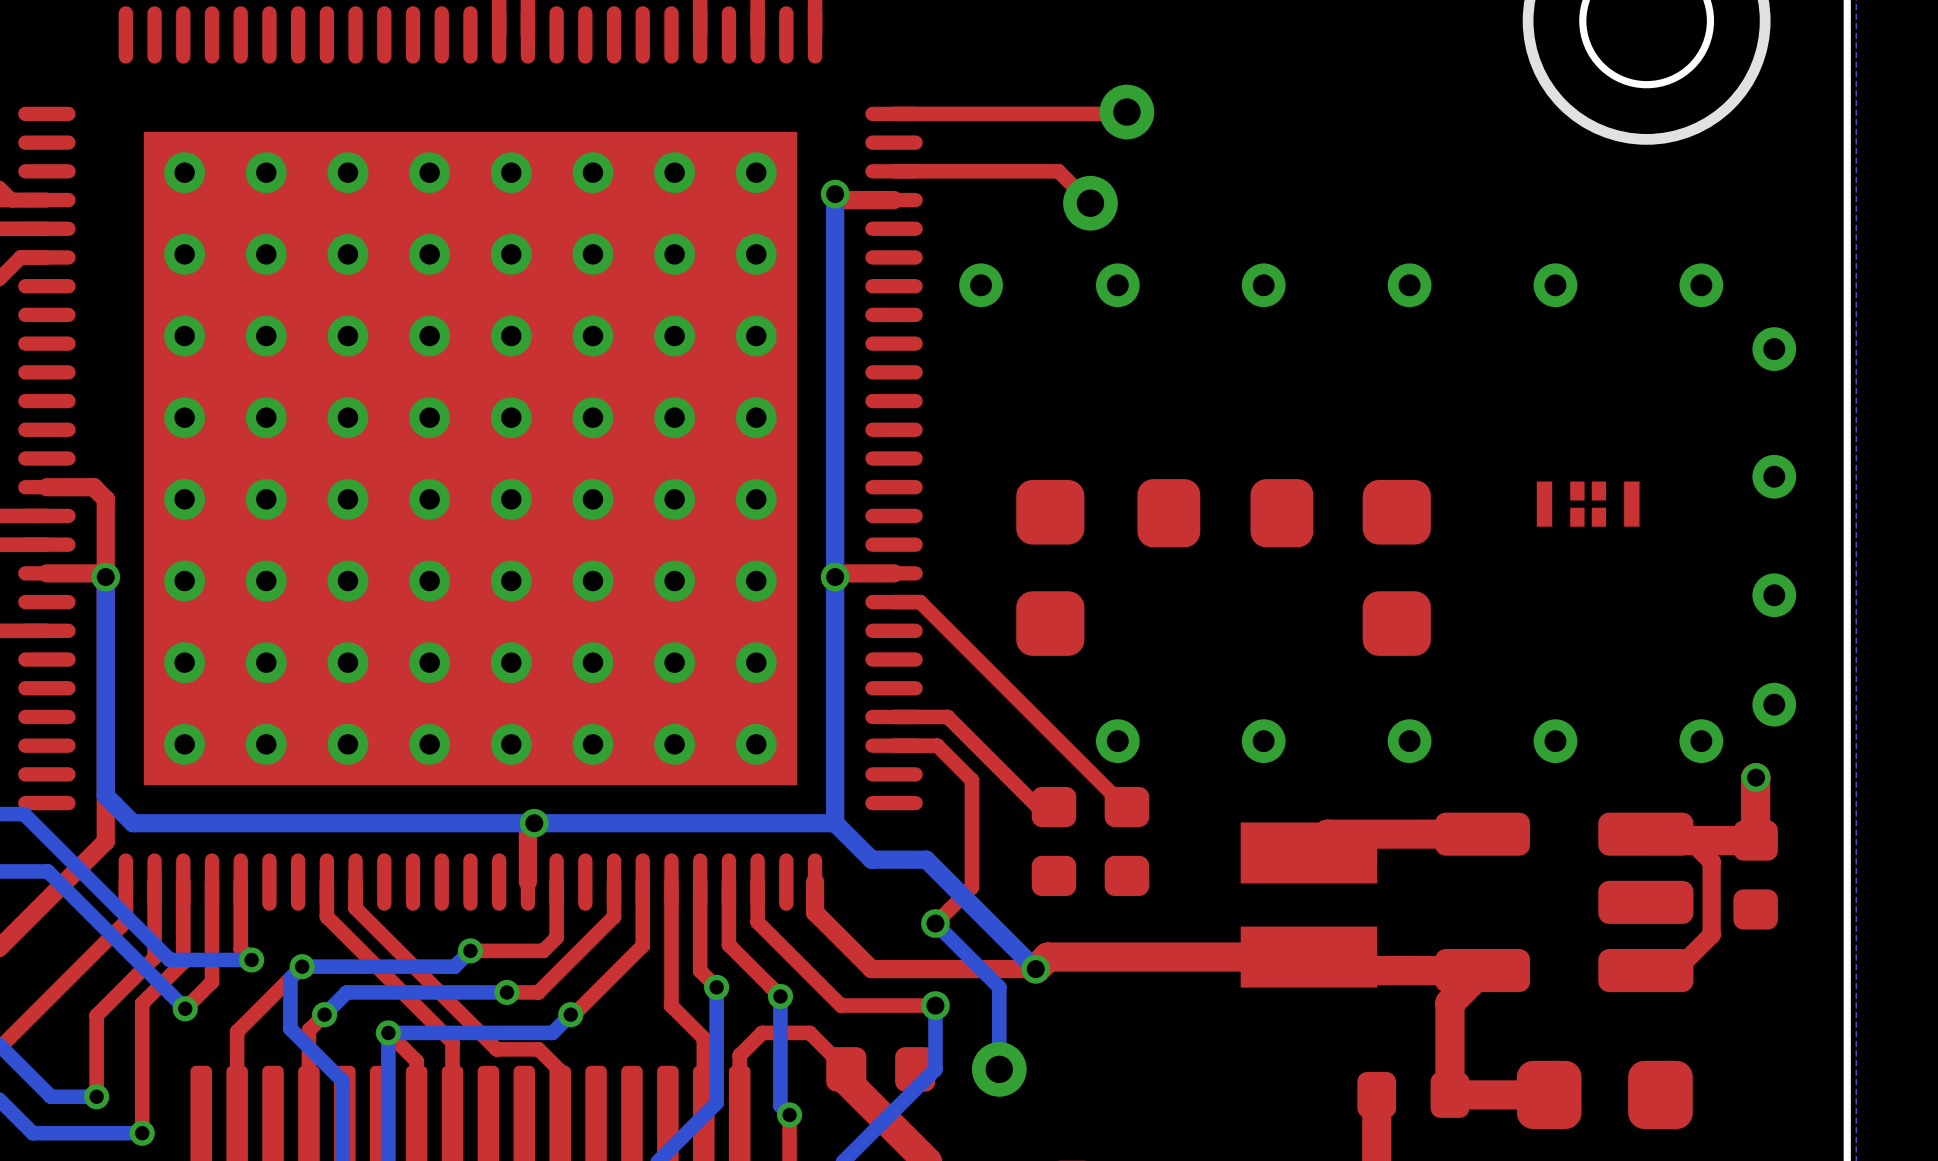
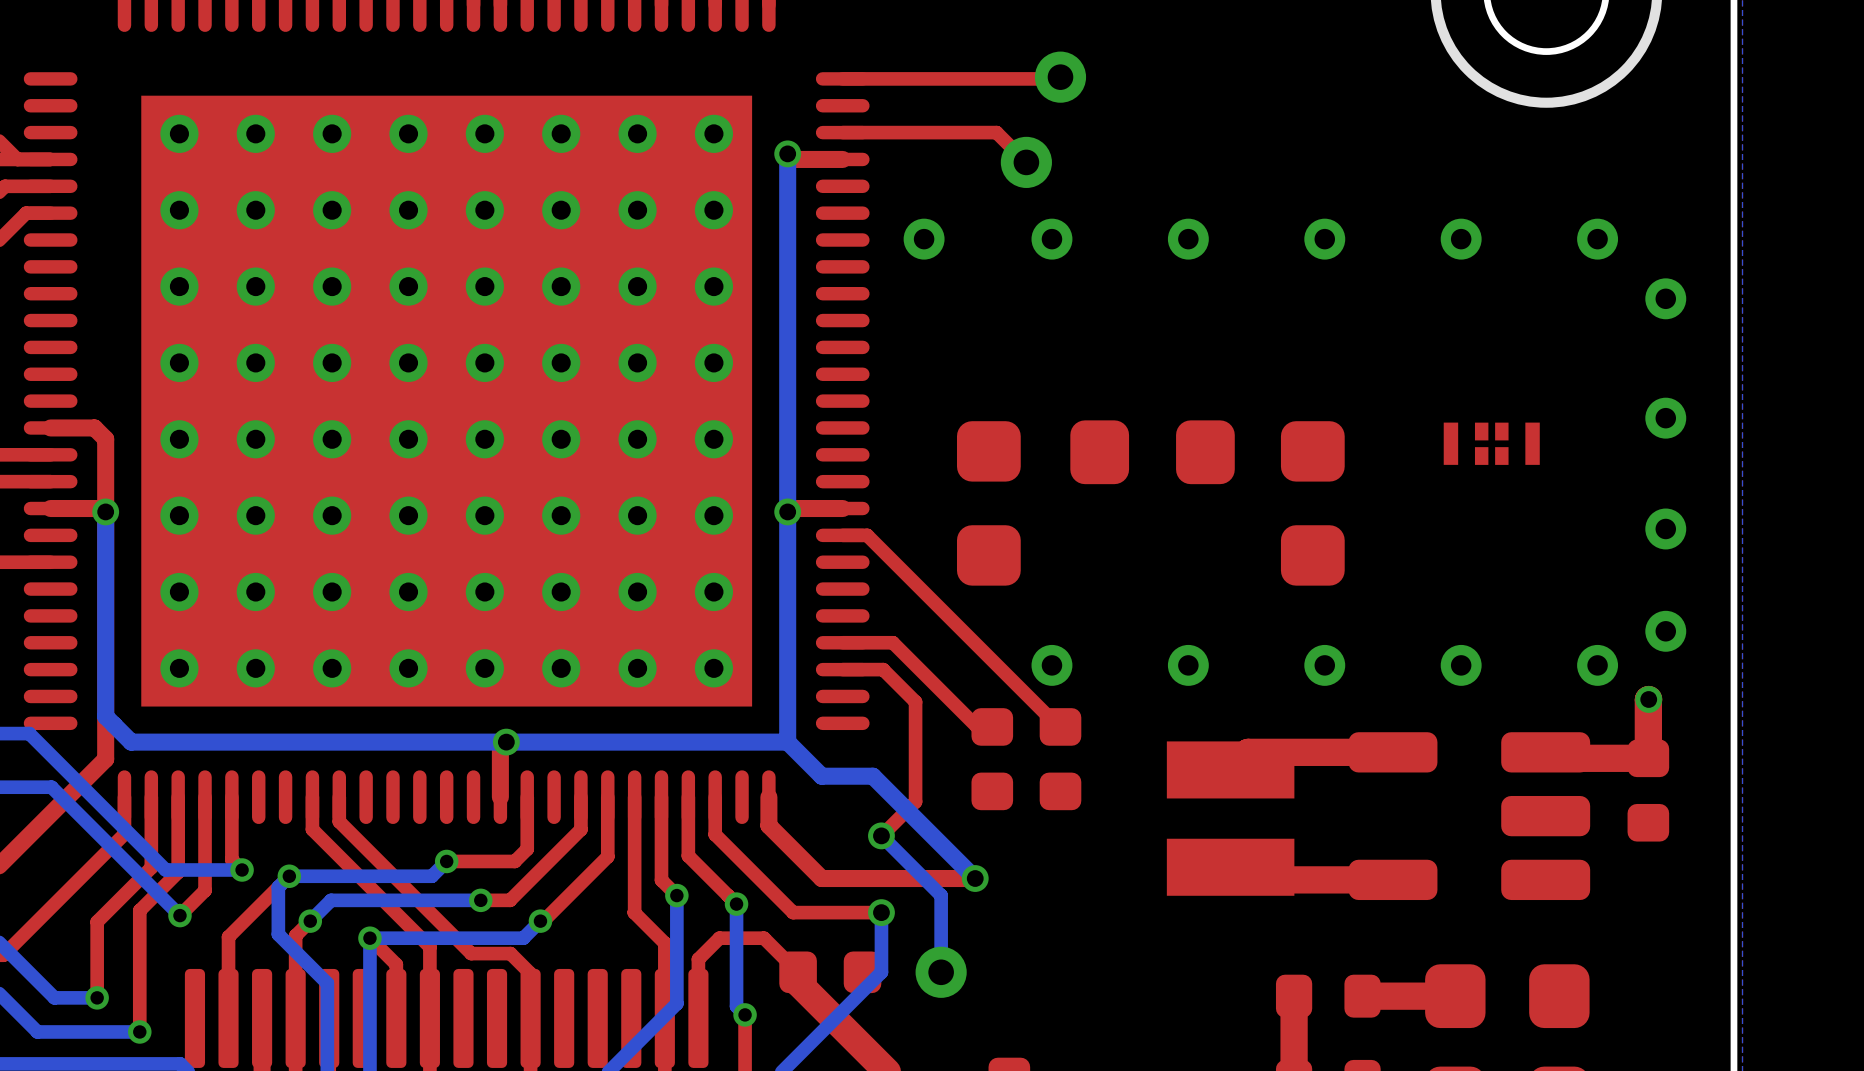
top track: (1645, 834) (1684, 834) (1711, 861) (1711, 934) (1675, 970) (1645, 970) -> none
top track: (1308, 957) (1047, 957) (1035, 969) -> none
top track: (1482, 970) (1449, 1003) (1449, 1094) -> none

